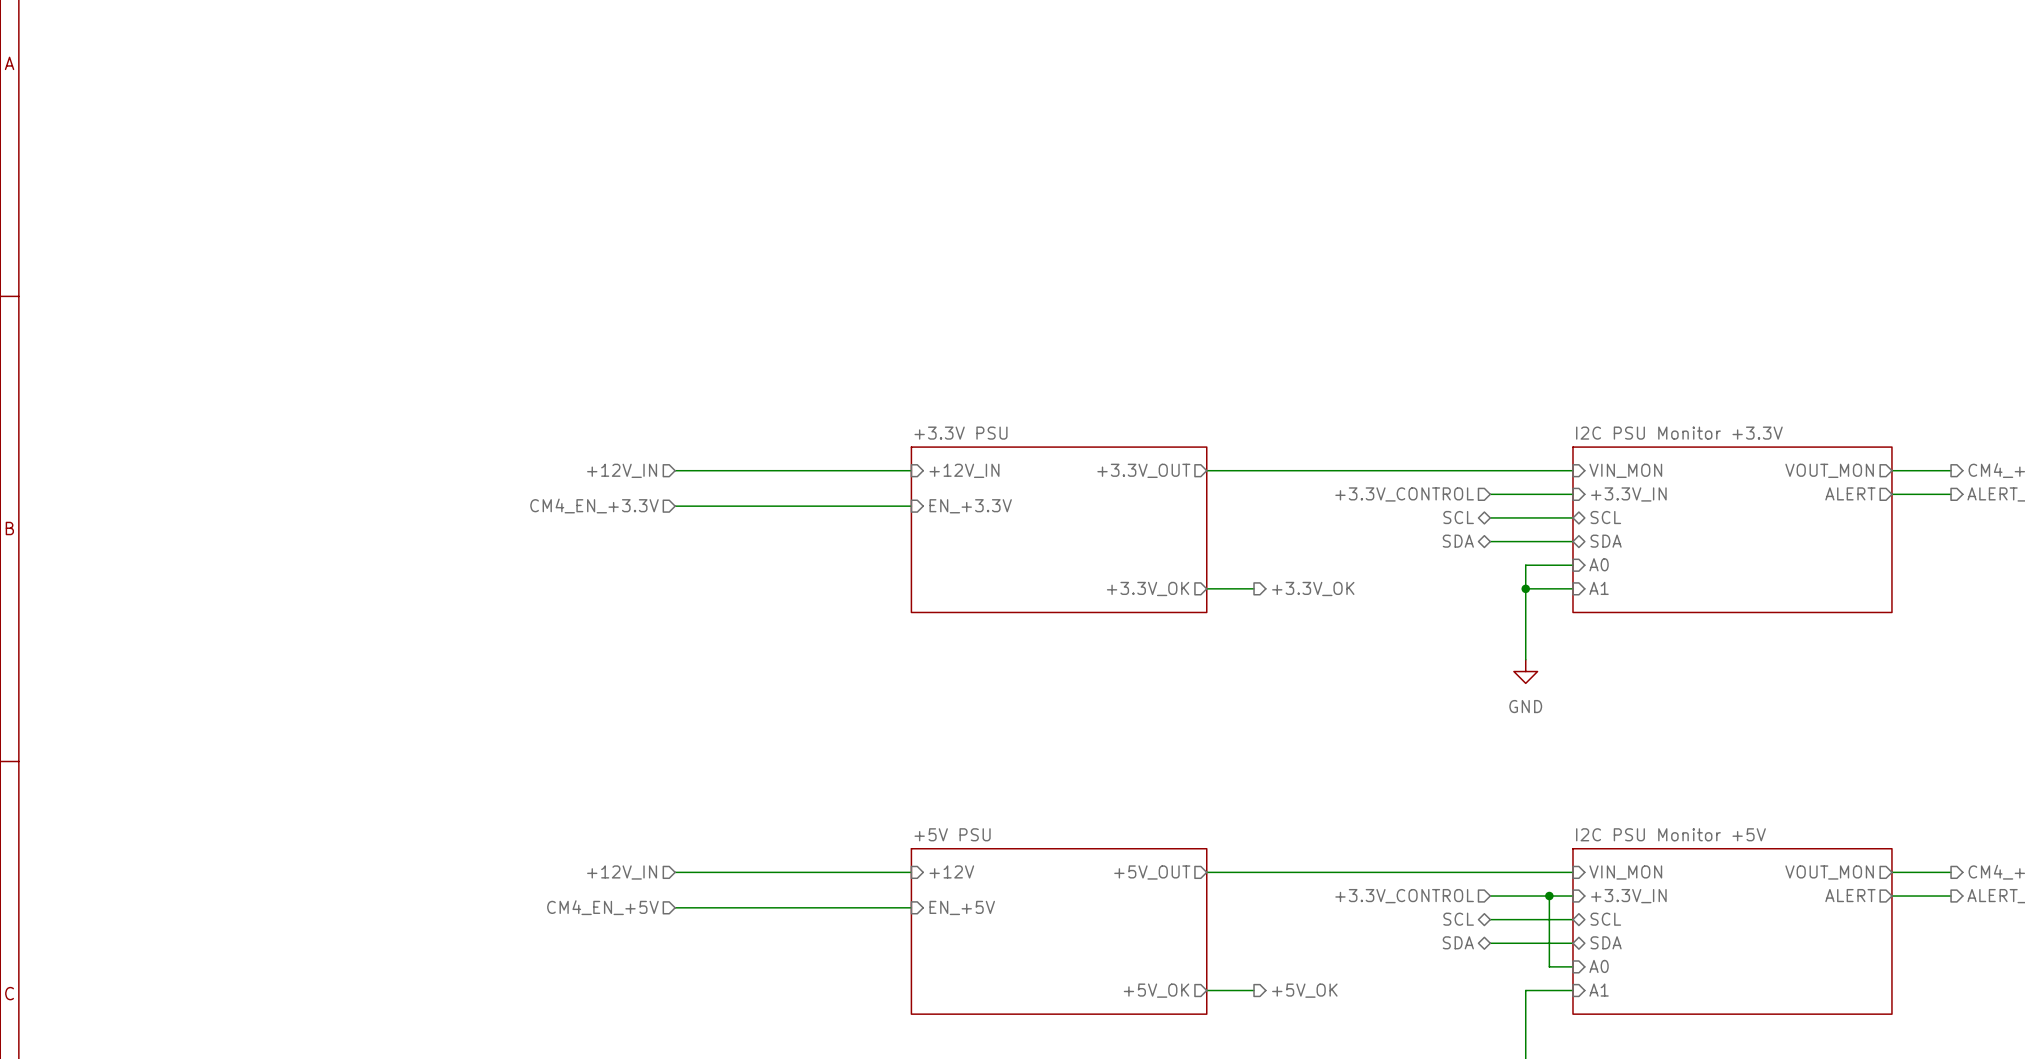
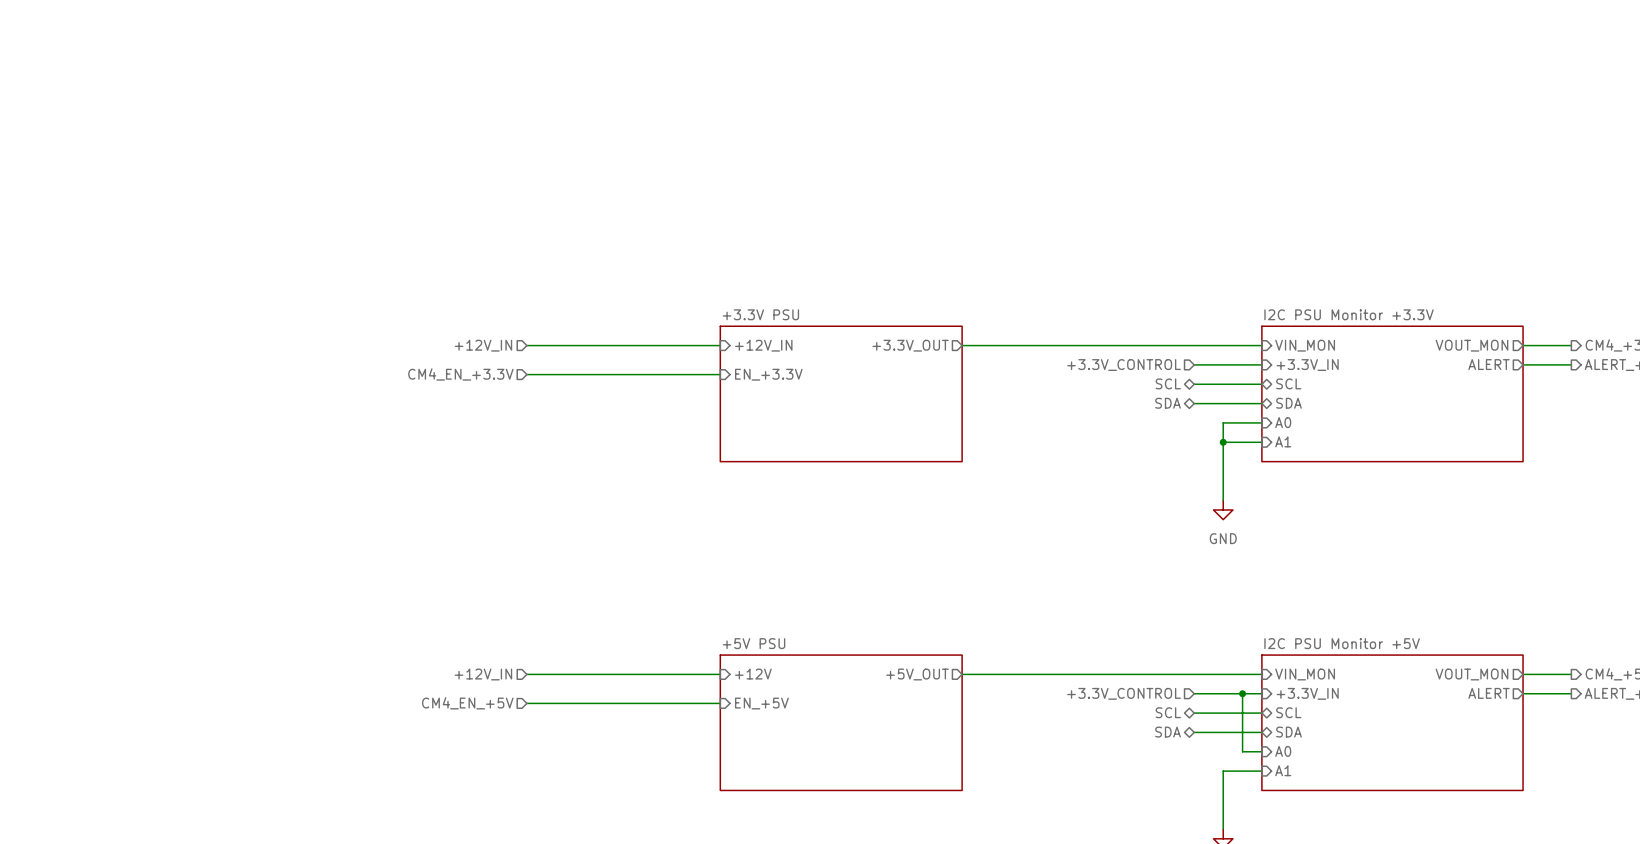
sheet pin: +3.3V_OK (1148, 588) -> none
wire: (1206, 588) (1254, 588) -> none
hierarchical label: +3.3V_OK (1313, 588) -> none
sheet pin: +5V_OK (1156, 990) -> none
wire: (1206, 990) (1254, 990) -> none
hierarchical label: +5V_OK (1304, 990) -> none

